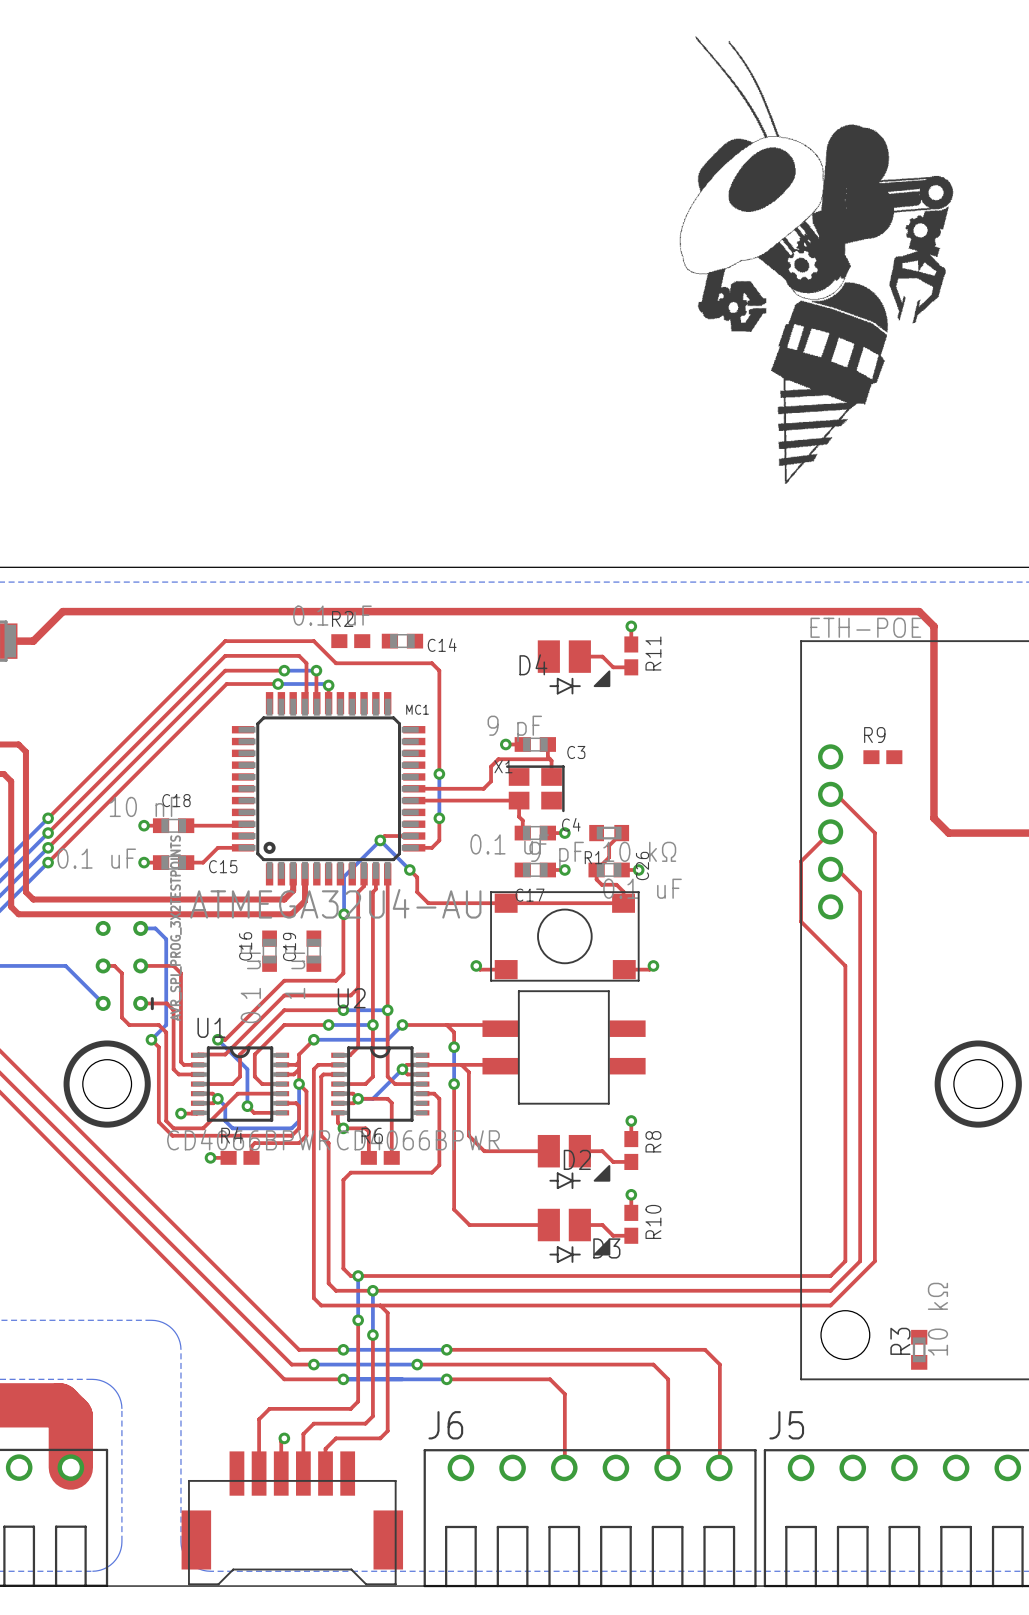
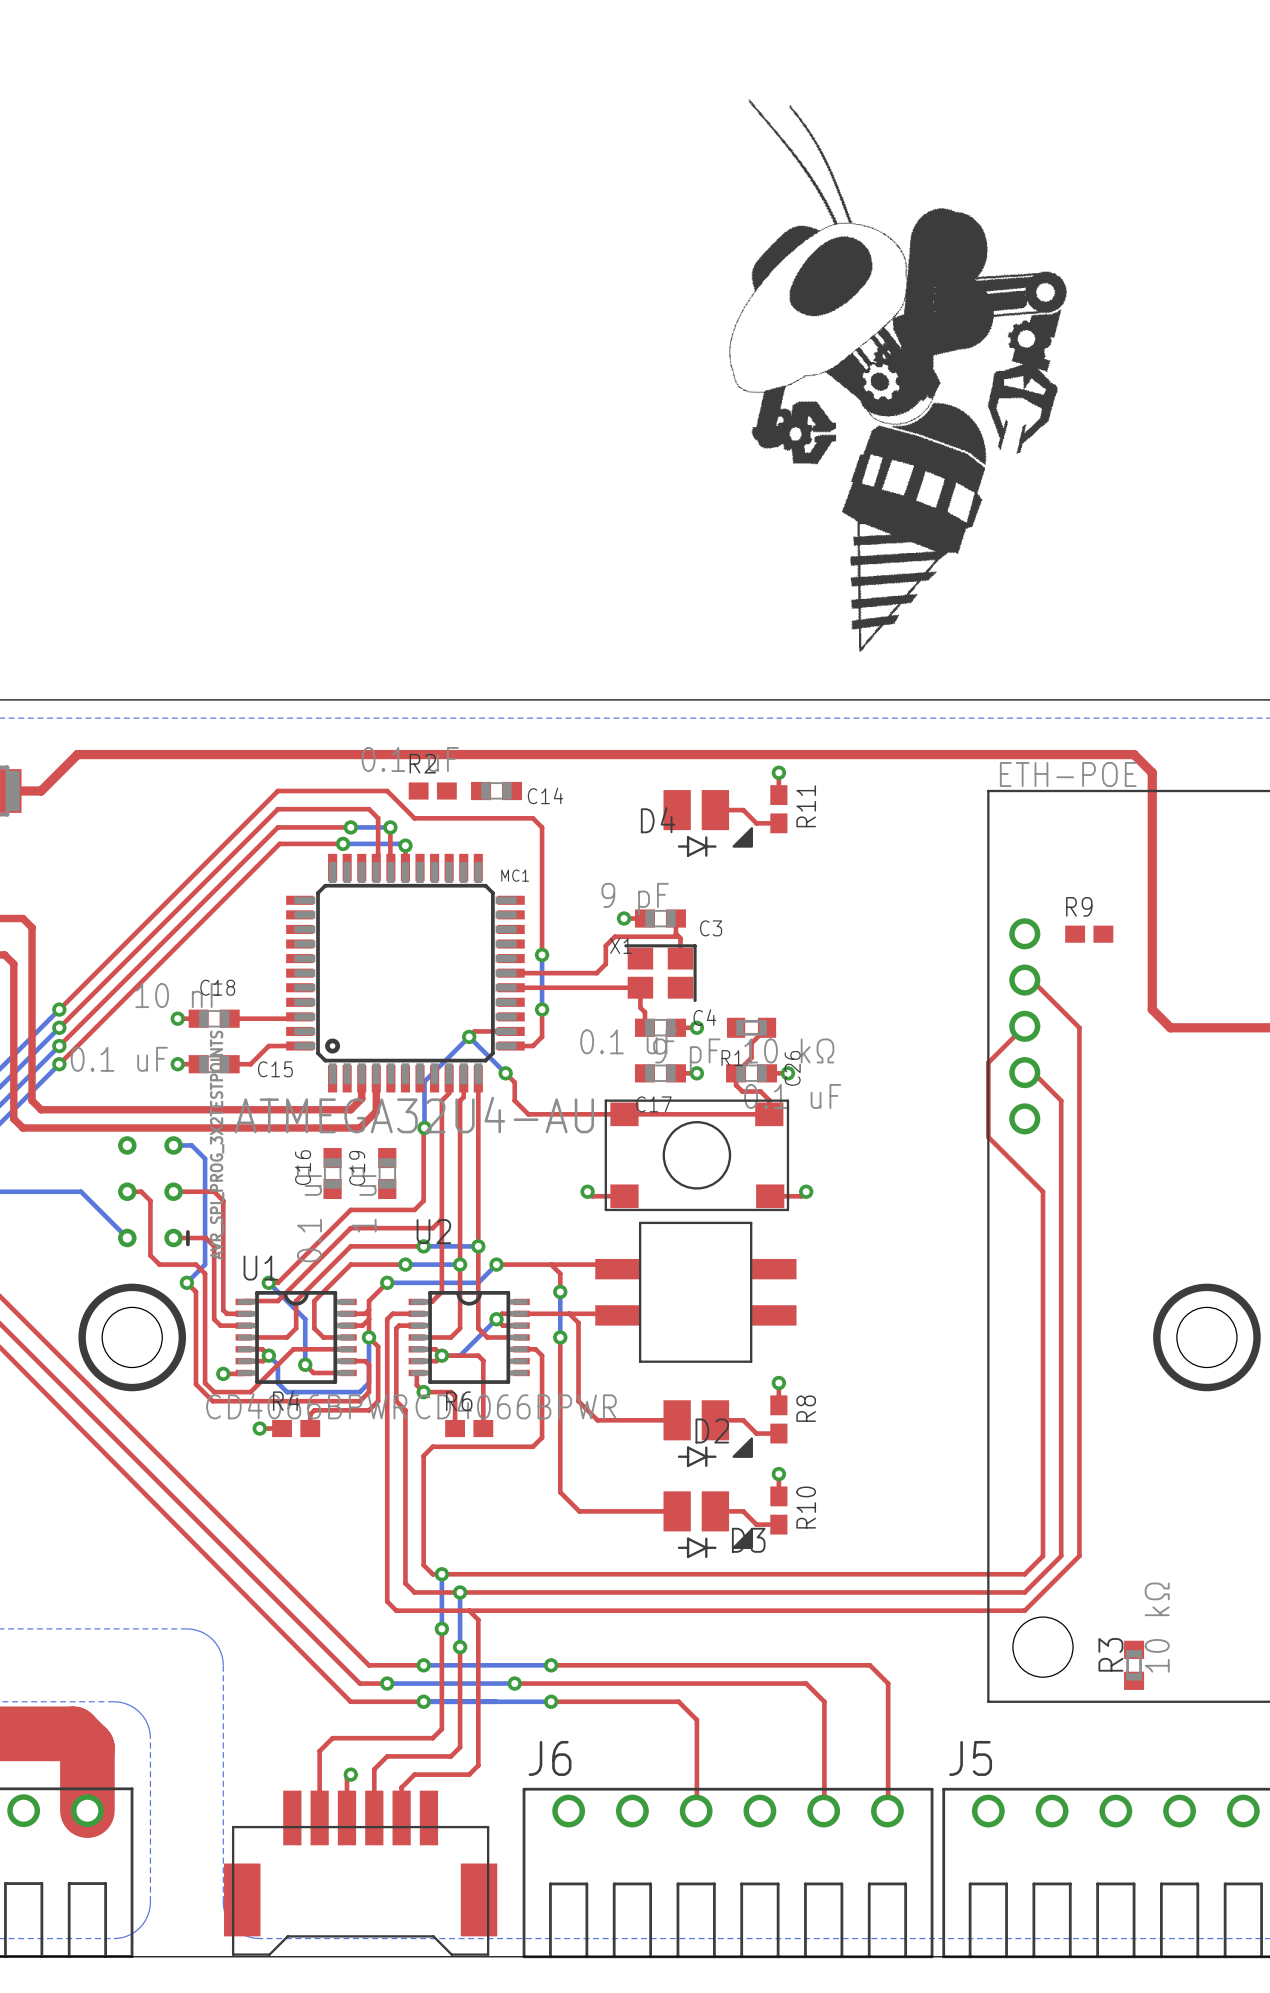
drawing position: (816, 259) -> (898, 375)

